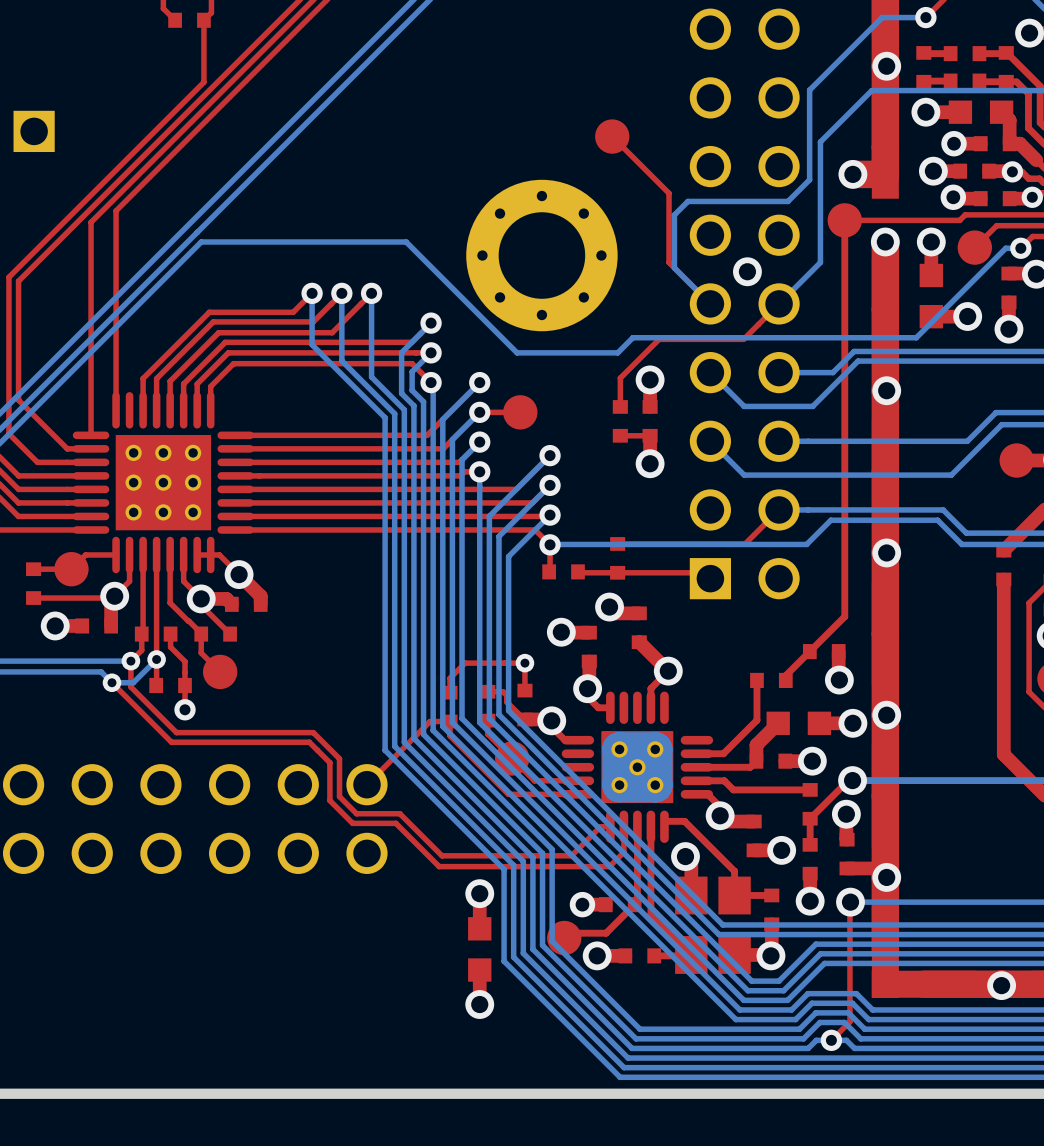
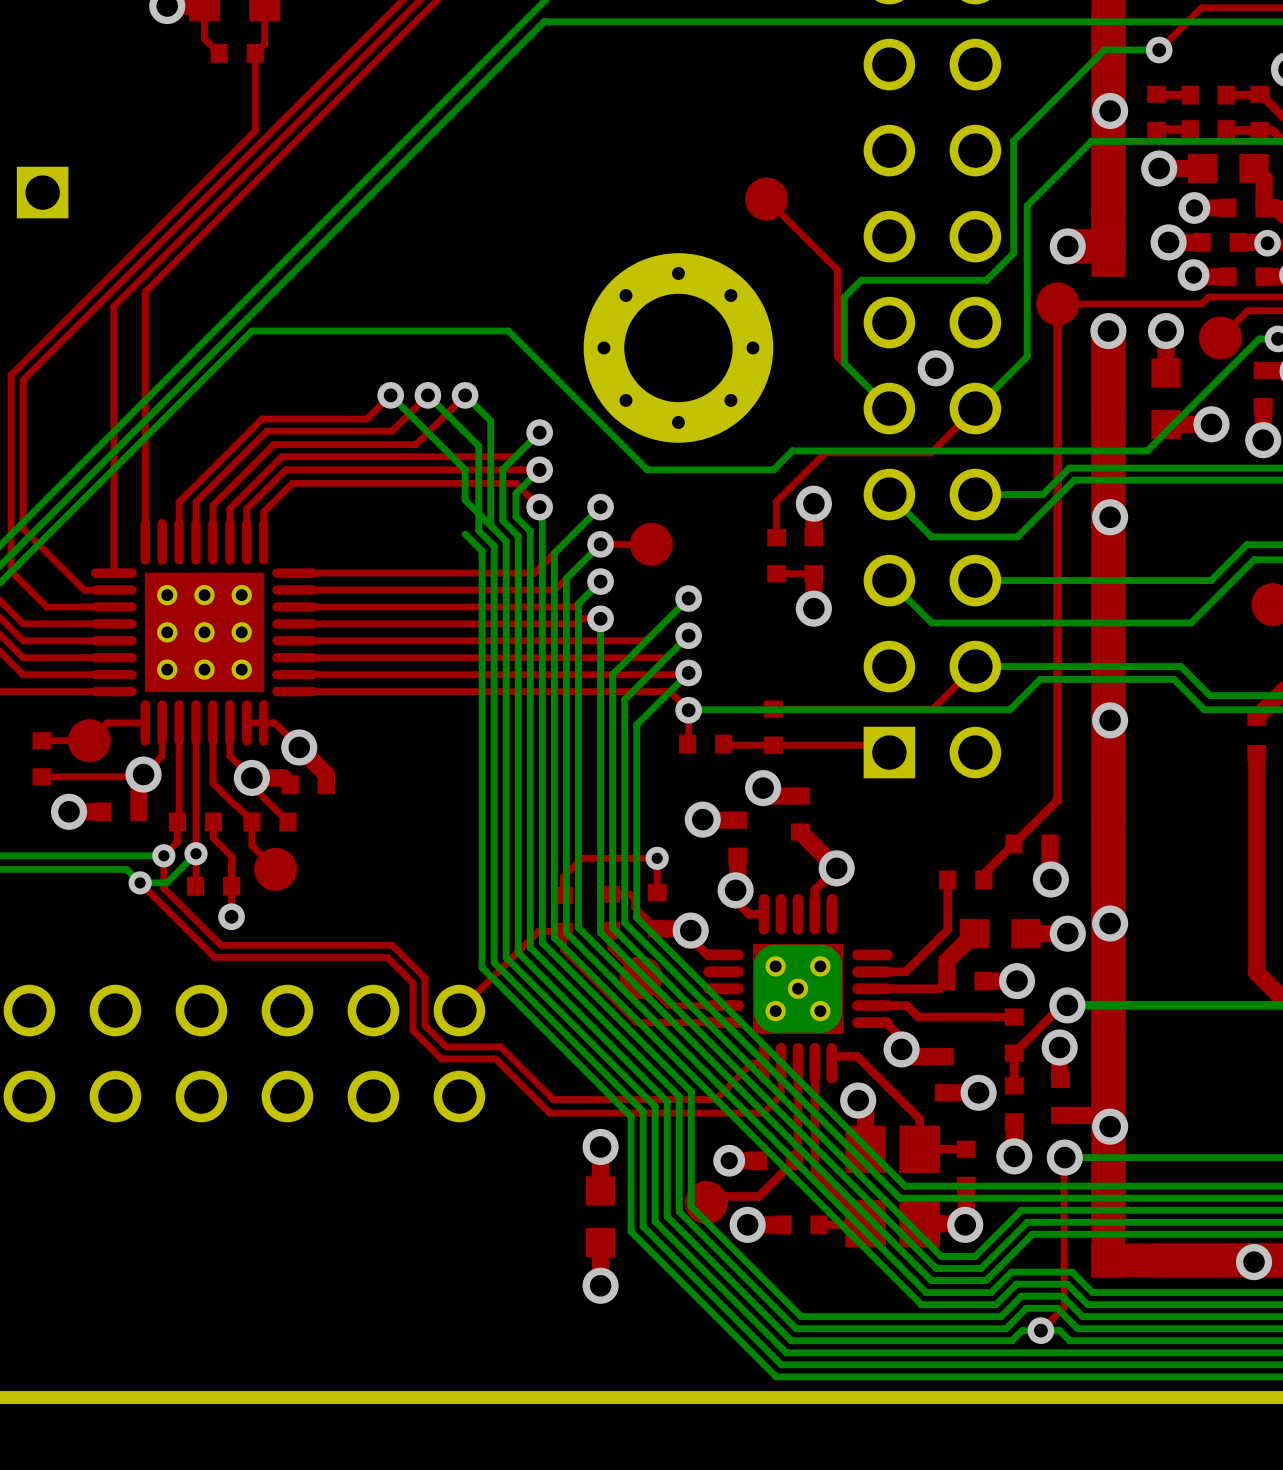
bottom track: (312, 293) (312, 344) (371, 404) -> (390, 395) (465, 469)
bottom track: (341, 293) (341, 360) (382, 401) -> (427, 395) (478, 446) (478, 530)
bottom track: (371, 293) (371, 352) -> (465, 395) (490, 420) (490, 525)

